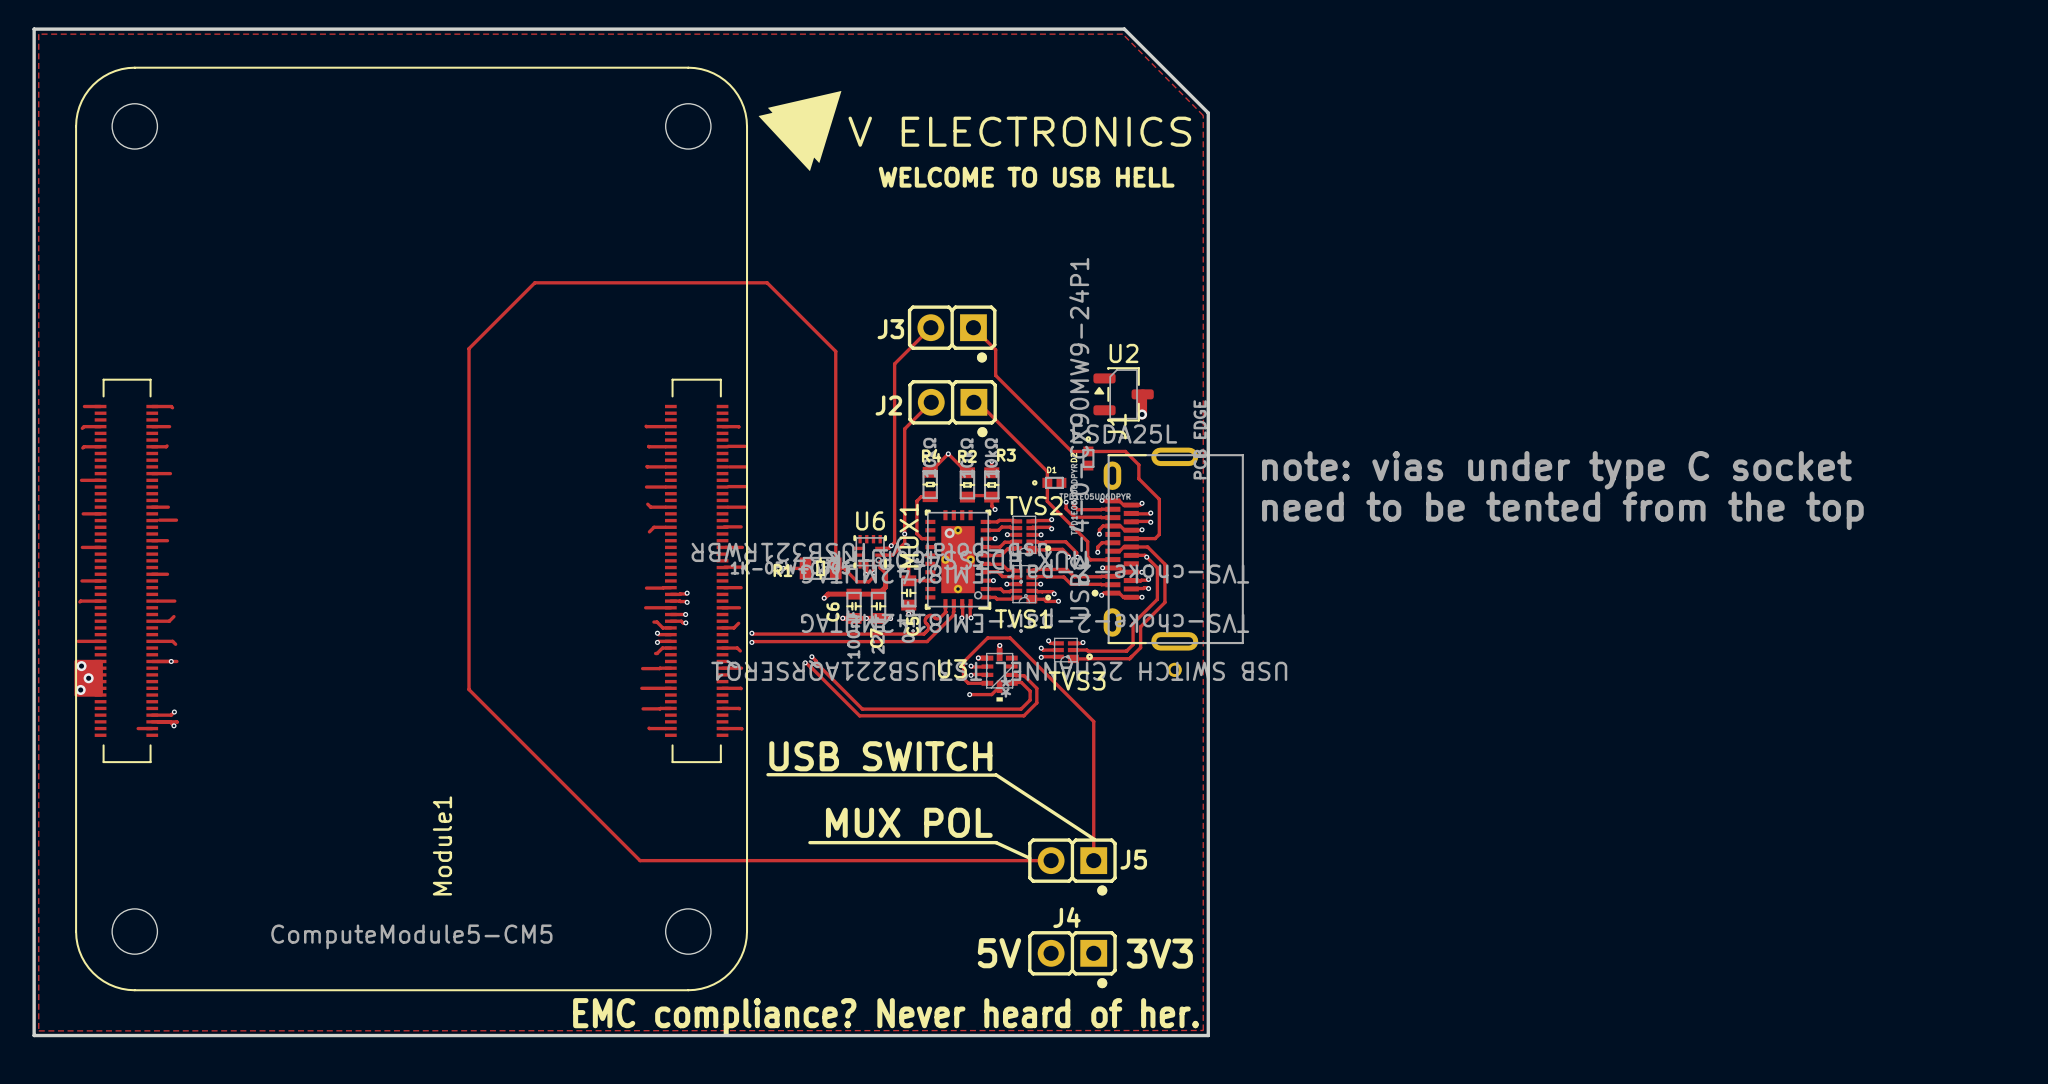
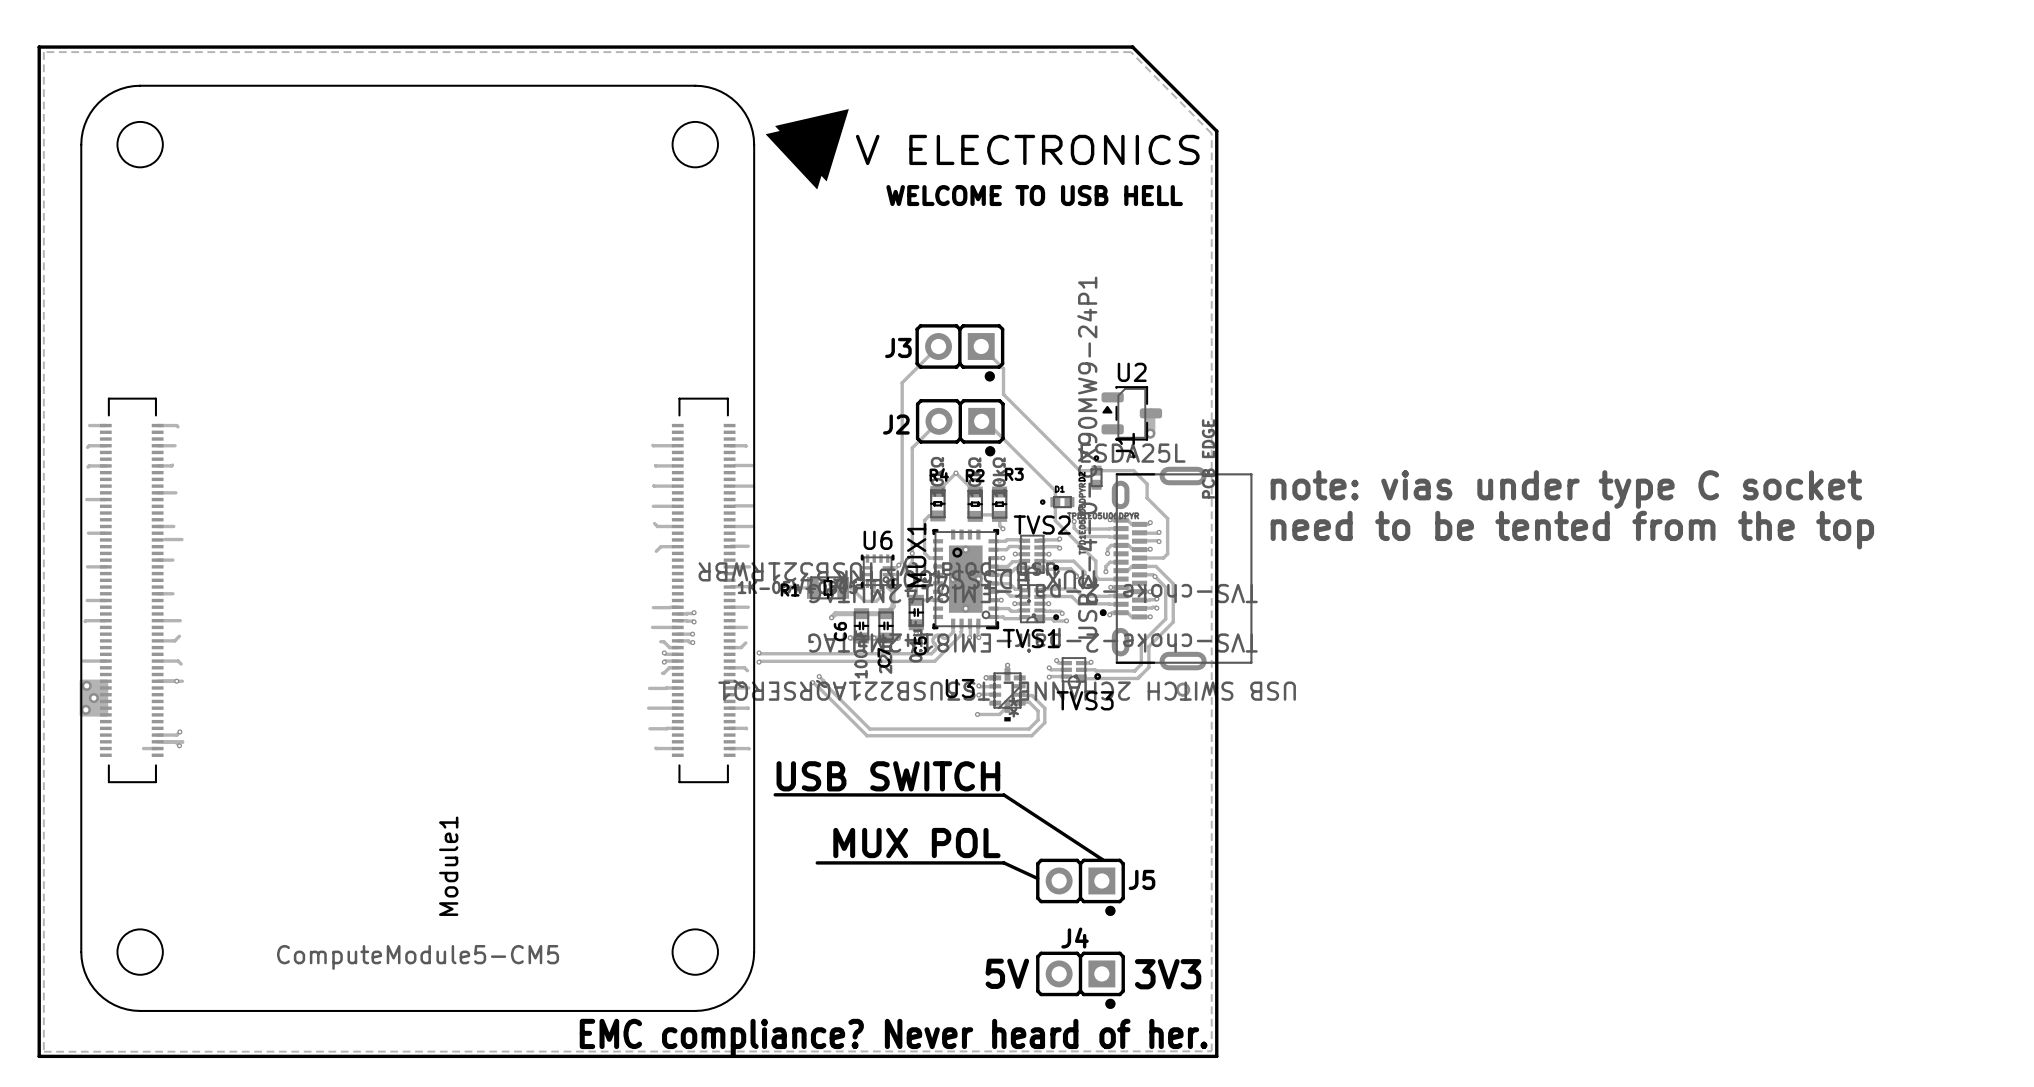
track: (835, 568) (835, 351) (767, 282) (534, 282) (469, 348) (469, 689) (640, 860) (1051, 860) -> none
track: (987, 683) (968, 683) (963, 678) (963, 662) (987, 637) (1010, 637) (1093, 721) (1093, 860) -> none

